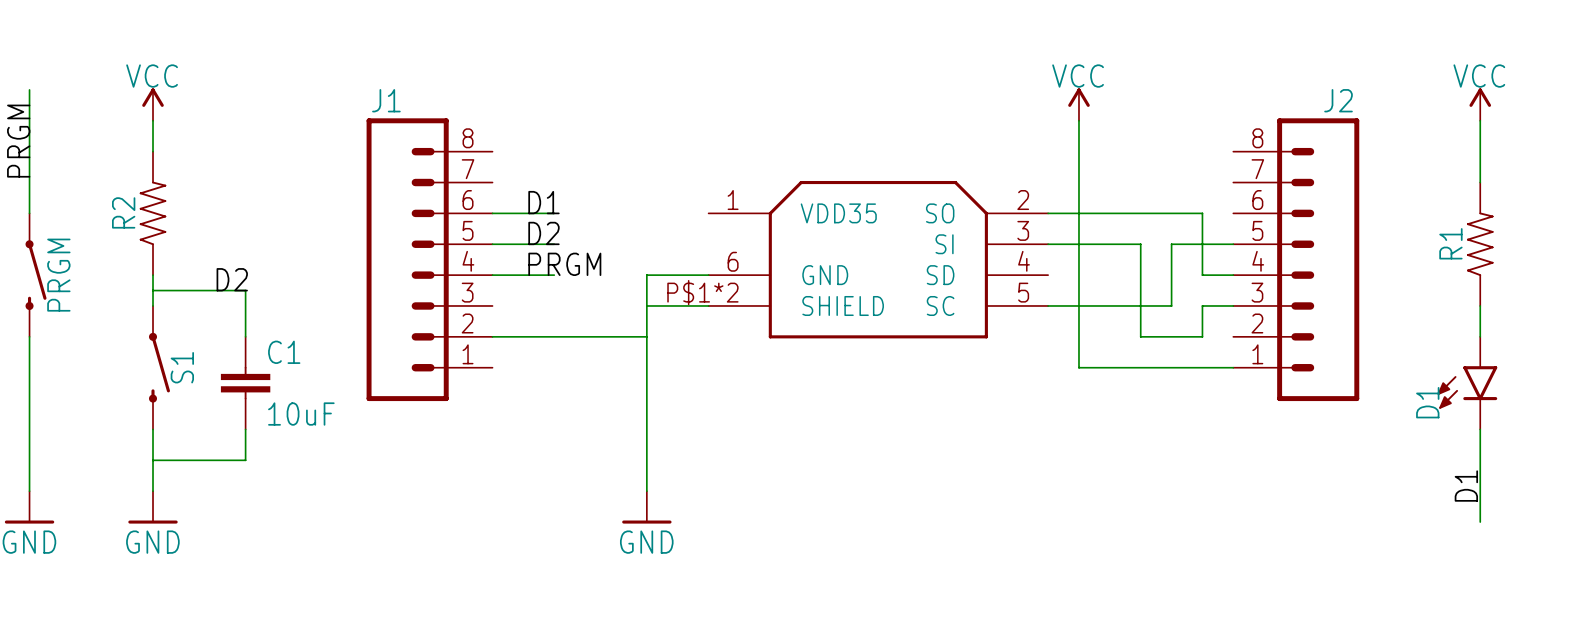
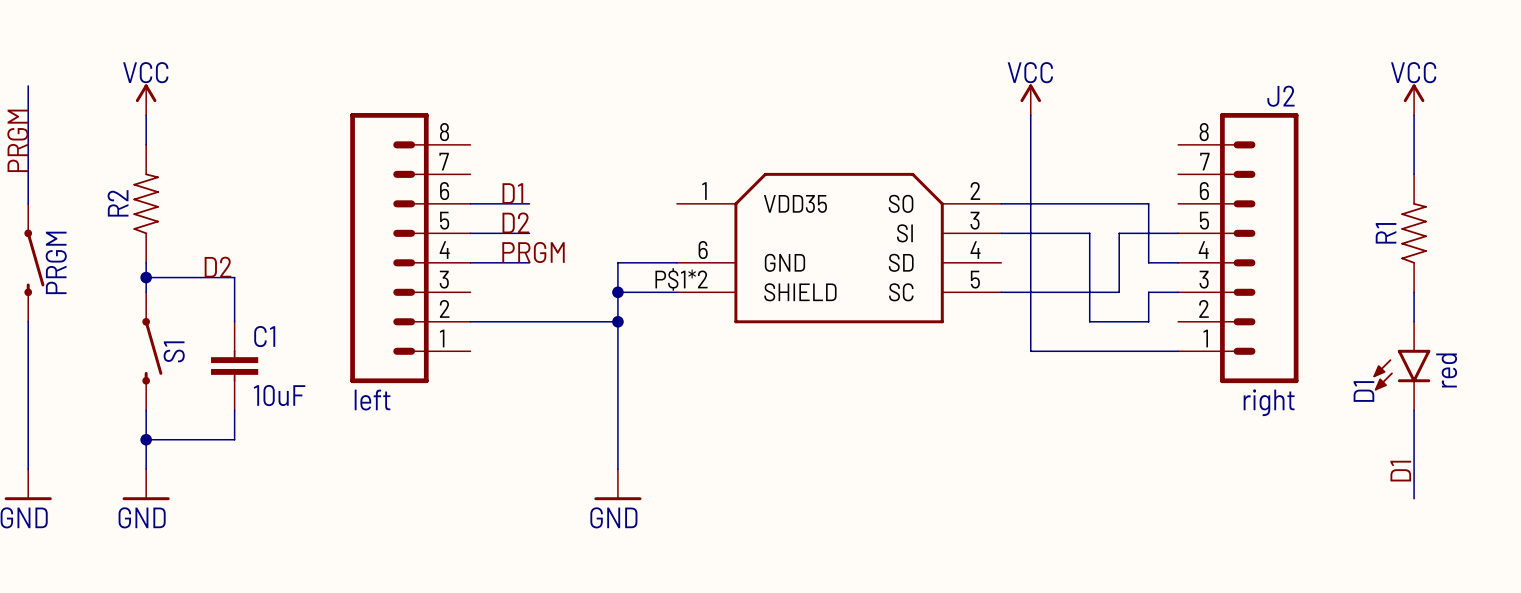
J1 name: J1 (386, 100) -> none
junction: none -> (146, 277)
junction: none -> (617, 292)
junction: none -> (617, 321)
D1 value: none -> red (1446, 370)
J1 value: none -> left (372, 400)
J2 value: none -> right (1269, 402)
junction: none -> (146, 439)

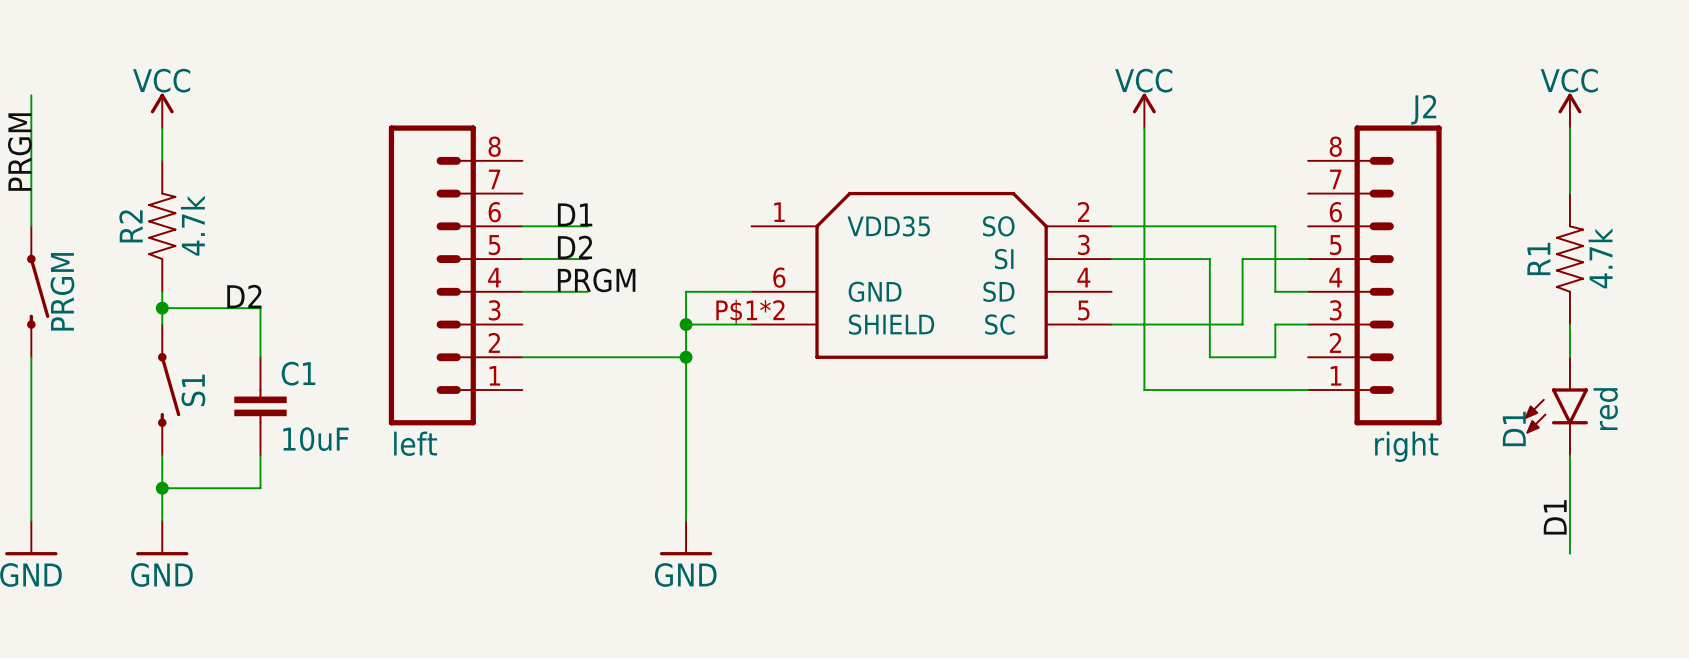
R2 value: none -> 4.7k (192, 225)
R1 value: none -> 4.7k (1600, 258)

